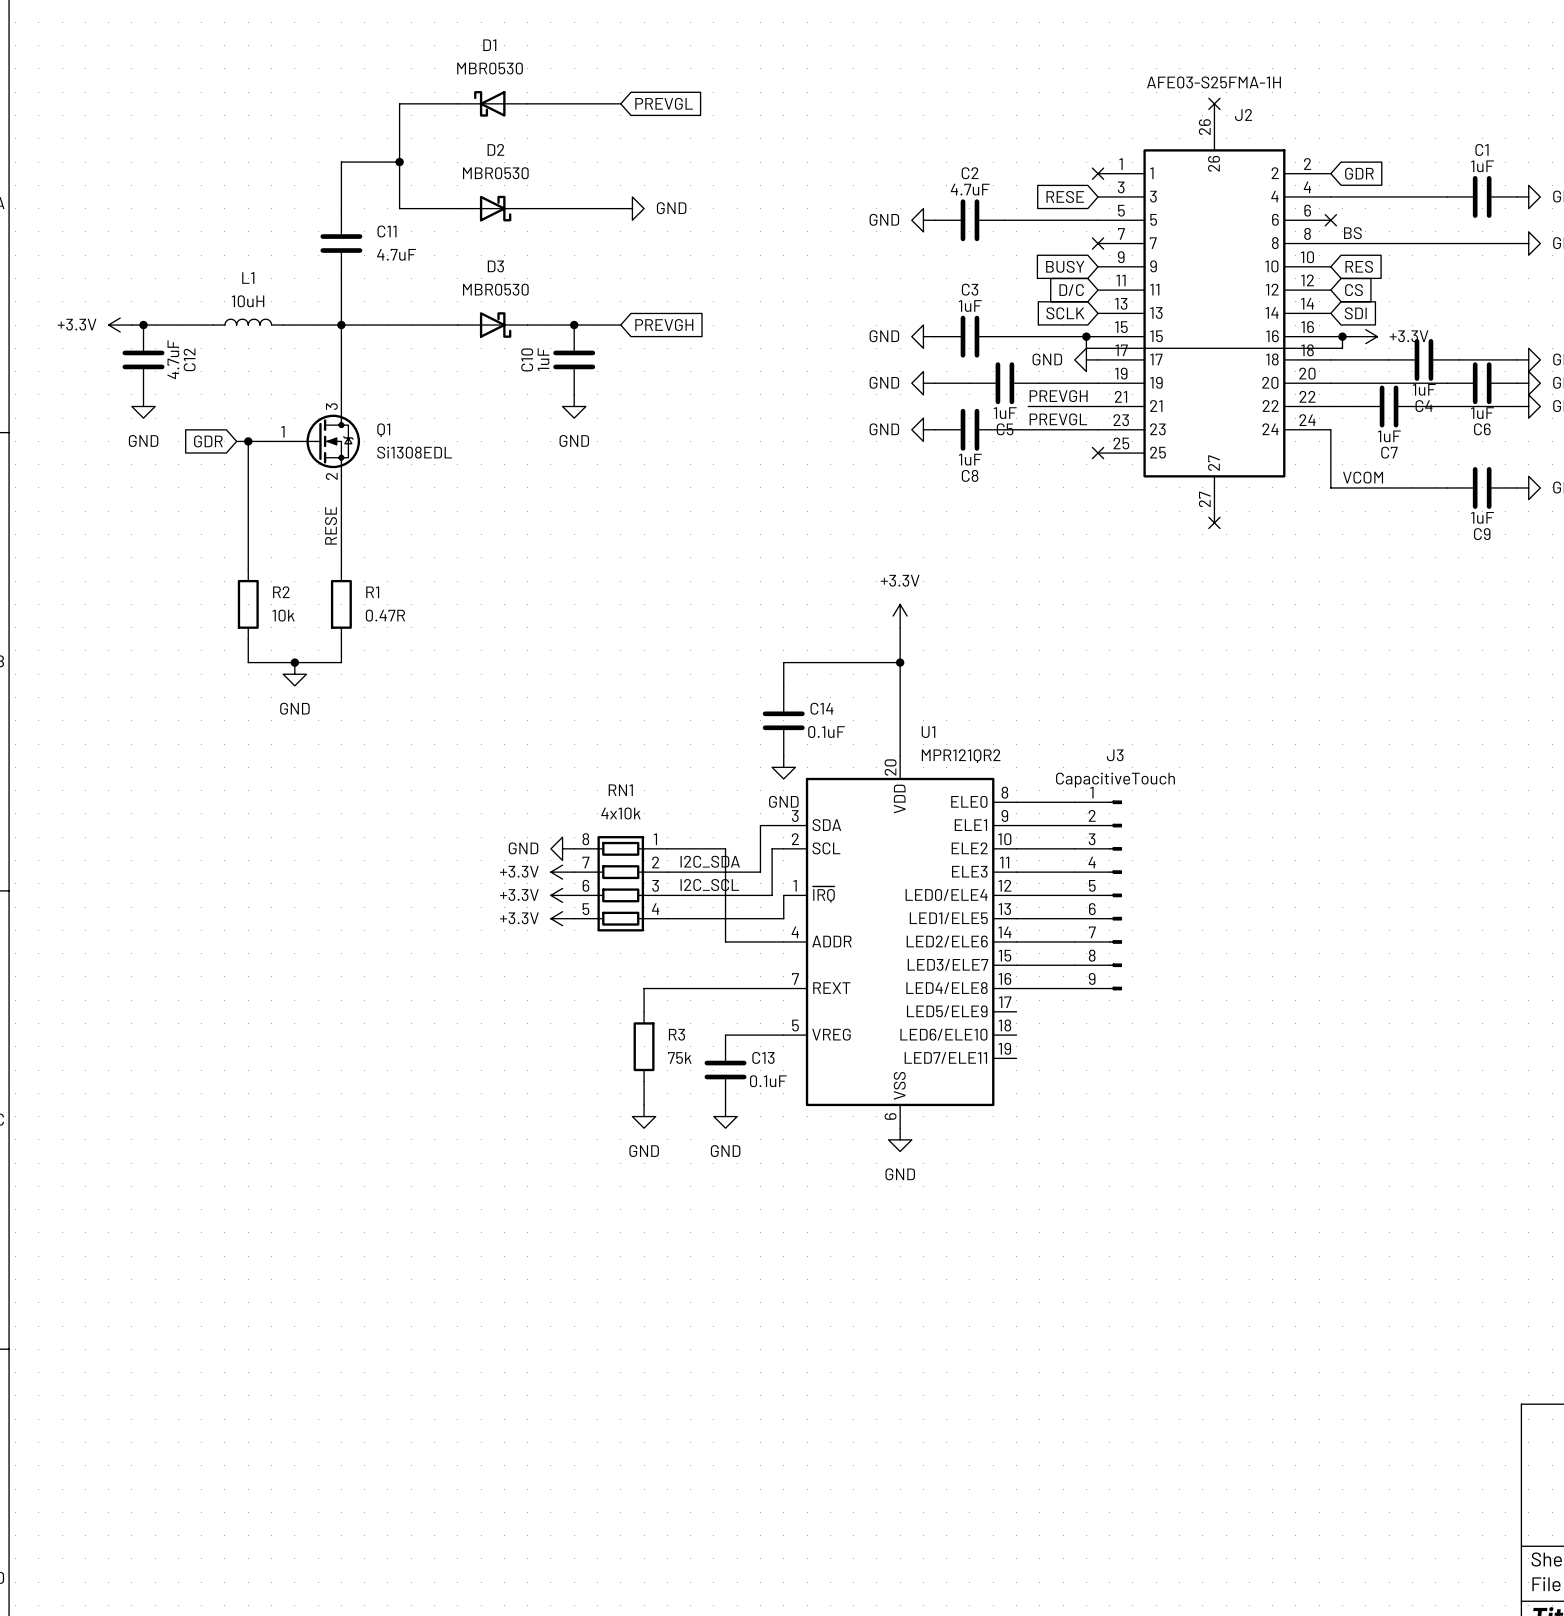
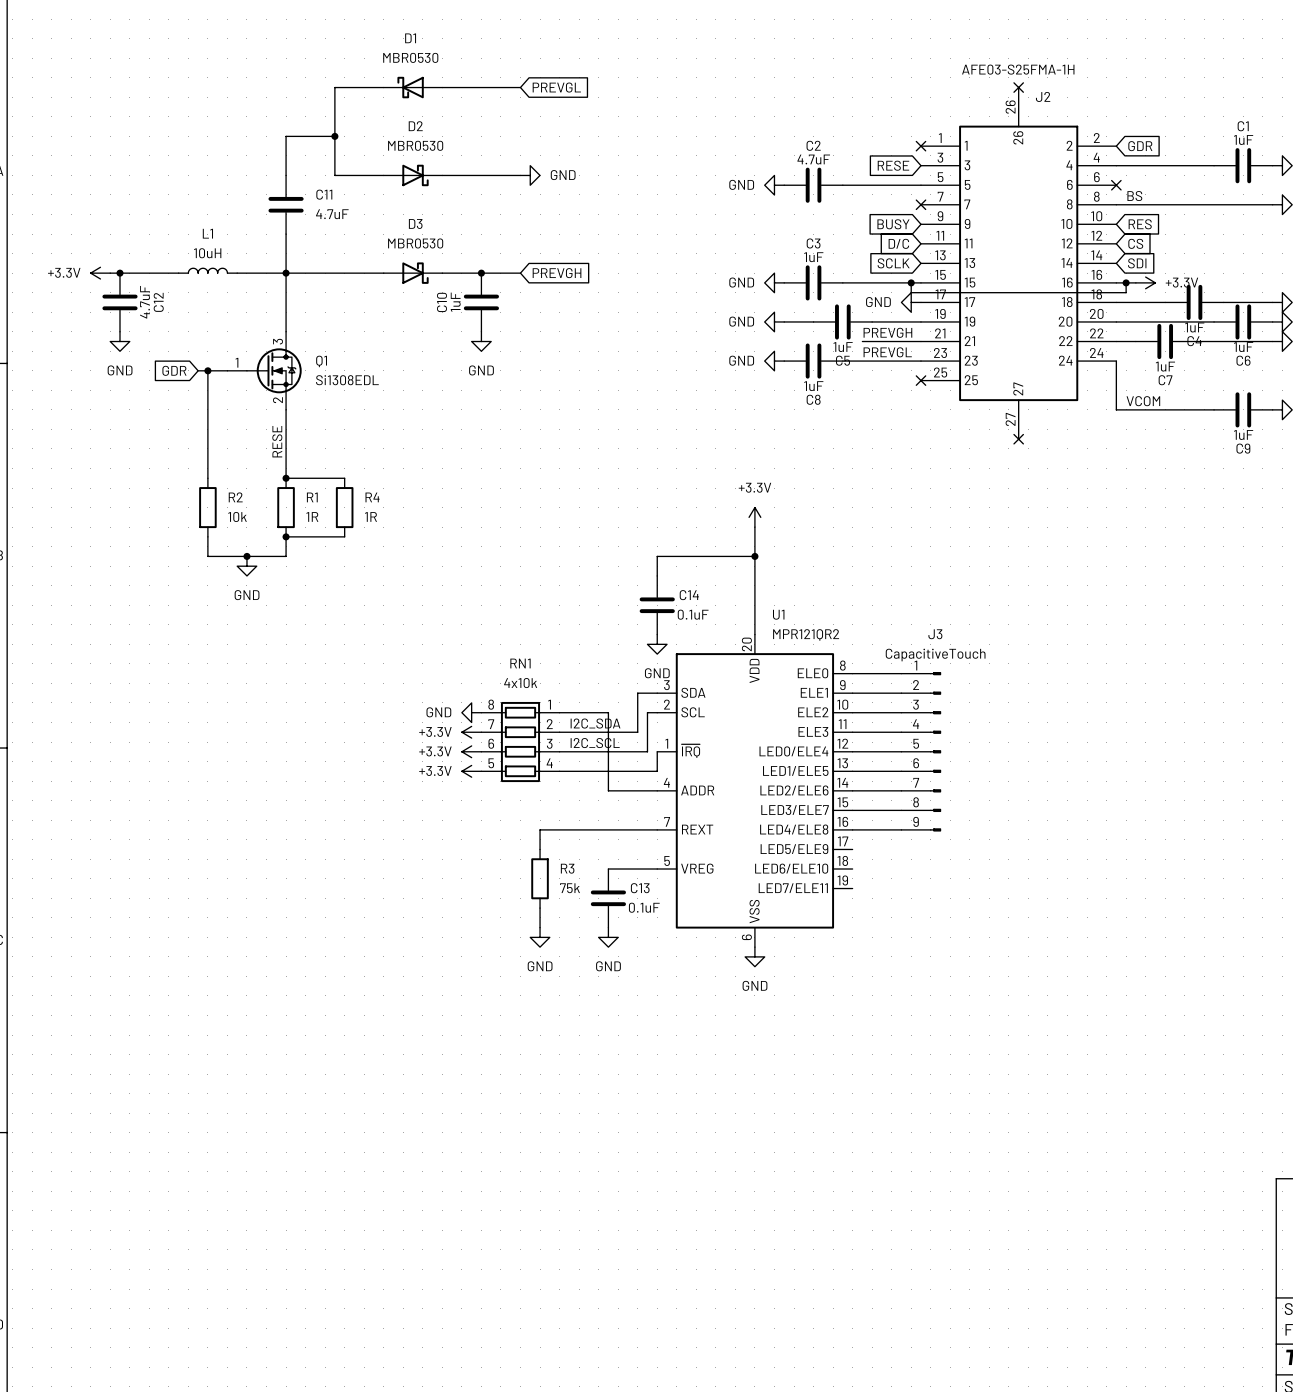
wire: none -> (286, 478) (344, 478)
junction: none -> (286, 478)
R4: none -> 1R (344, 507)
R1 value: 0.47R (385, 615) -> 1R (312, 516)
wire: none -> (286, 536) (344, 536)
junction: none -> (286, 536)

